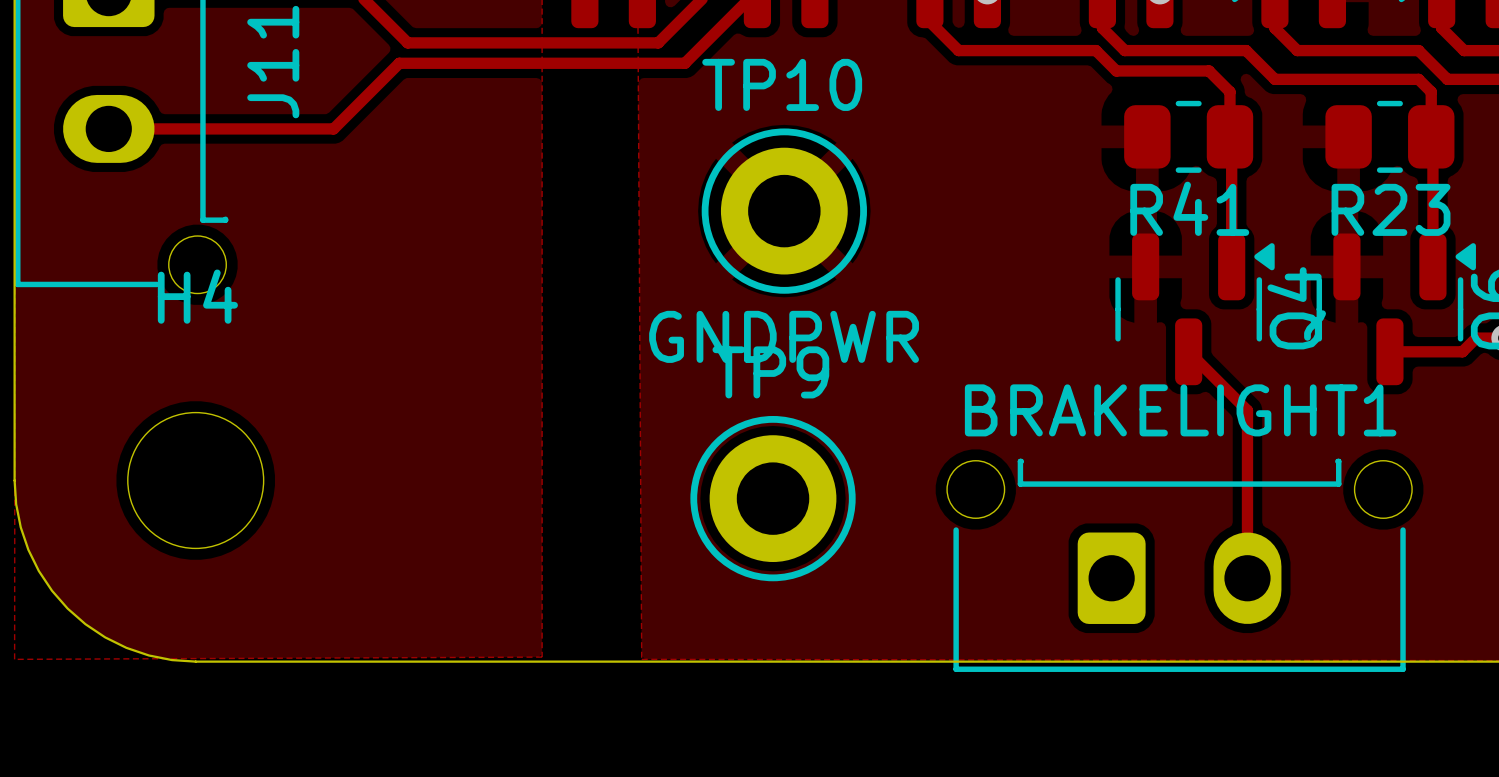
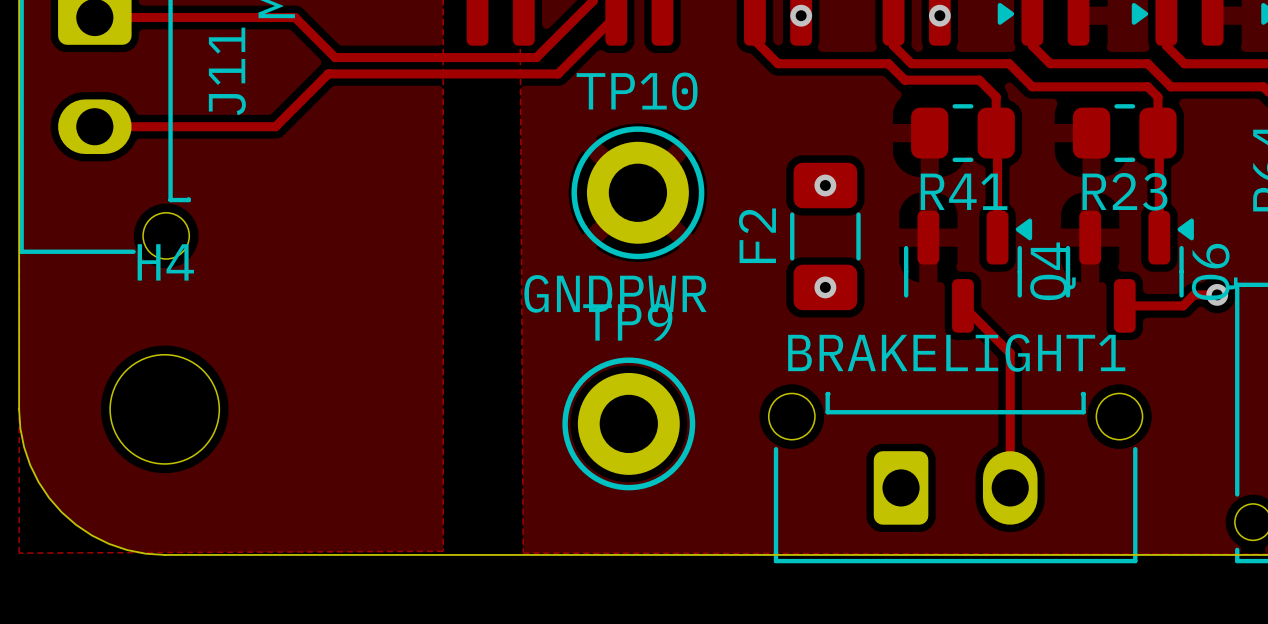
via: none -> (825, 185)
F2: none -> (825, 236)
via: none -> (825, 287)

